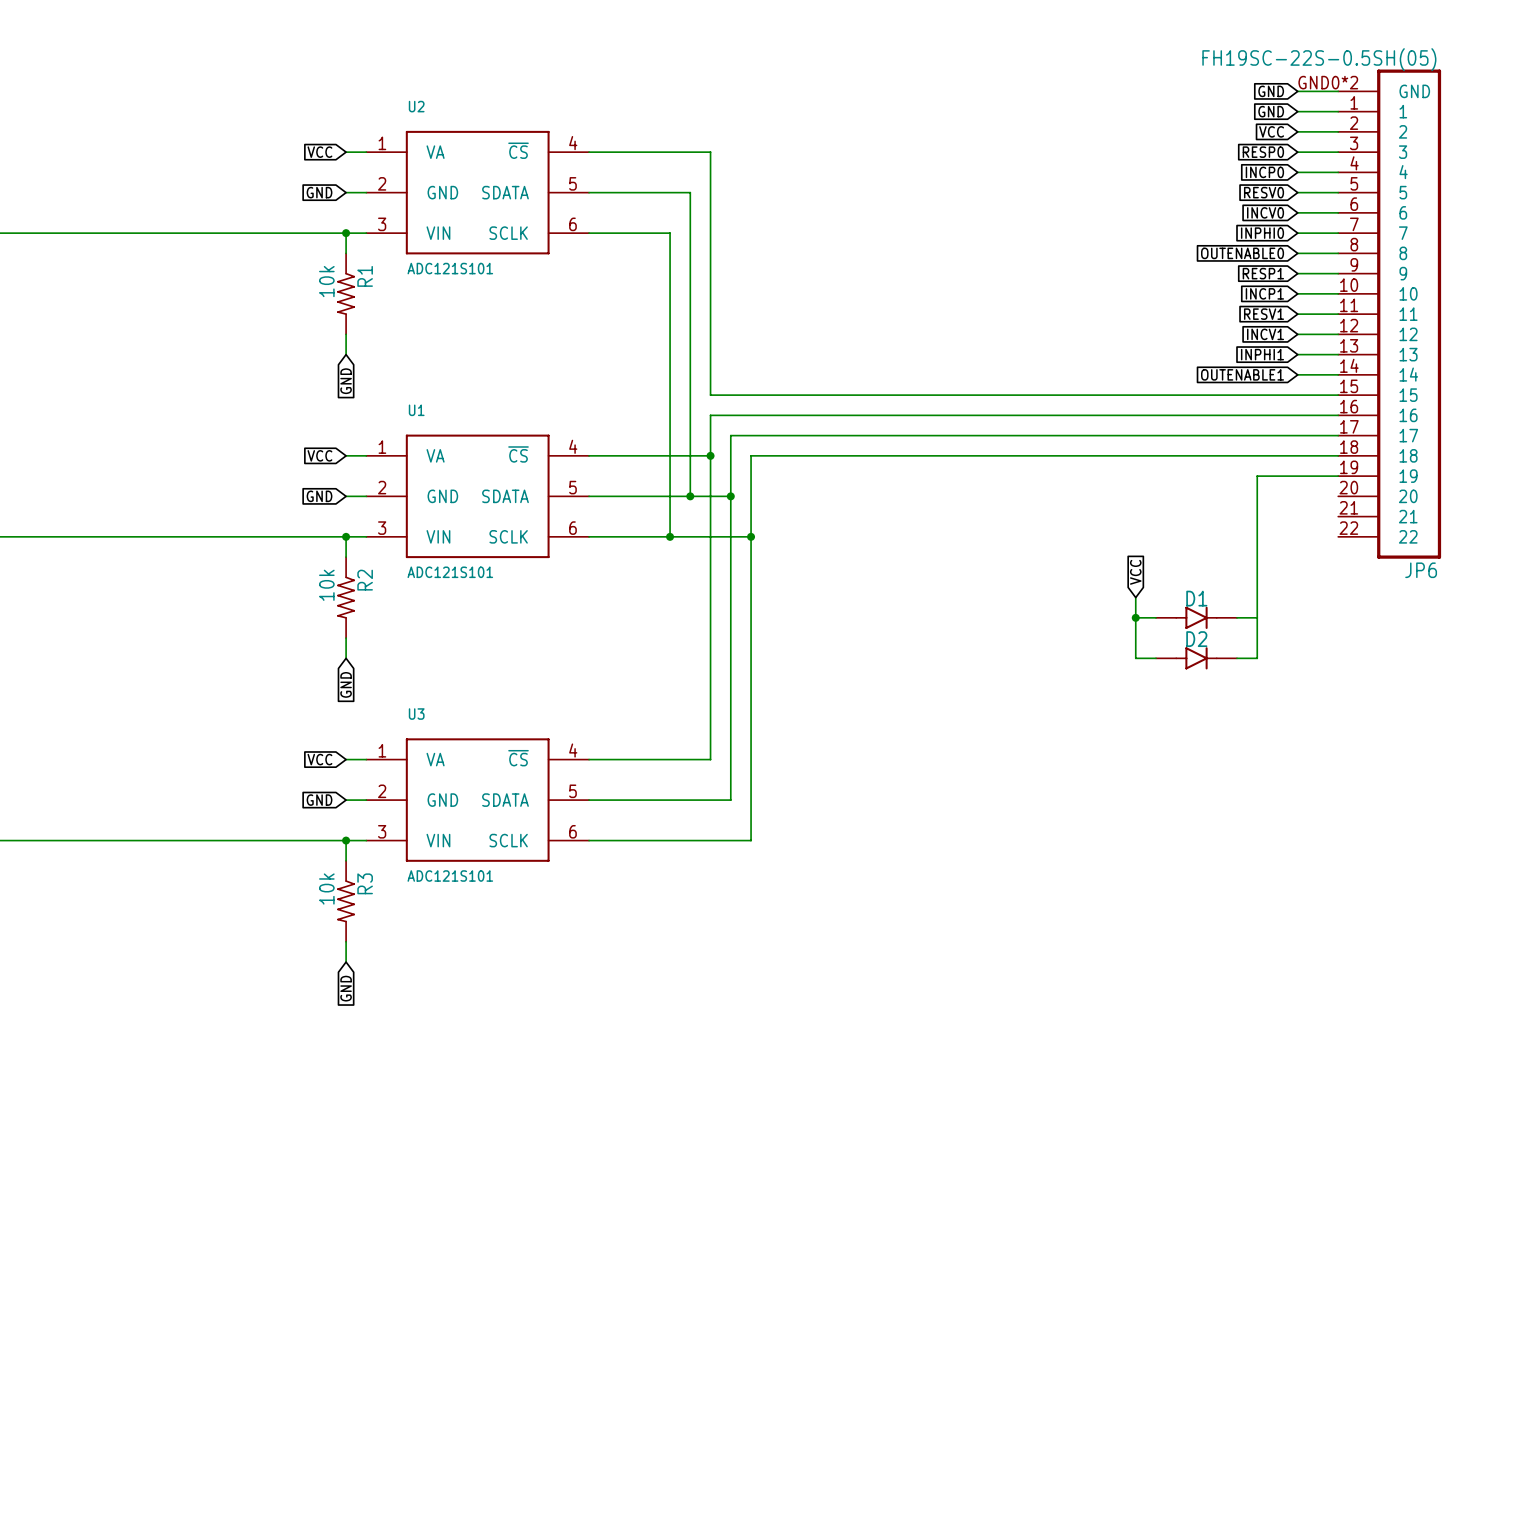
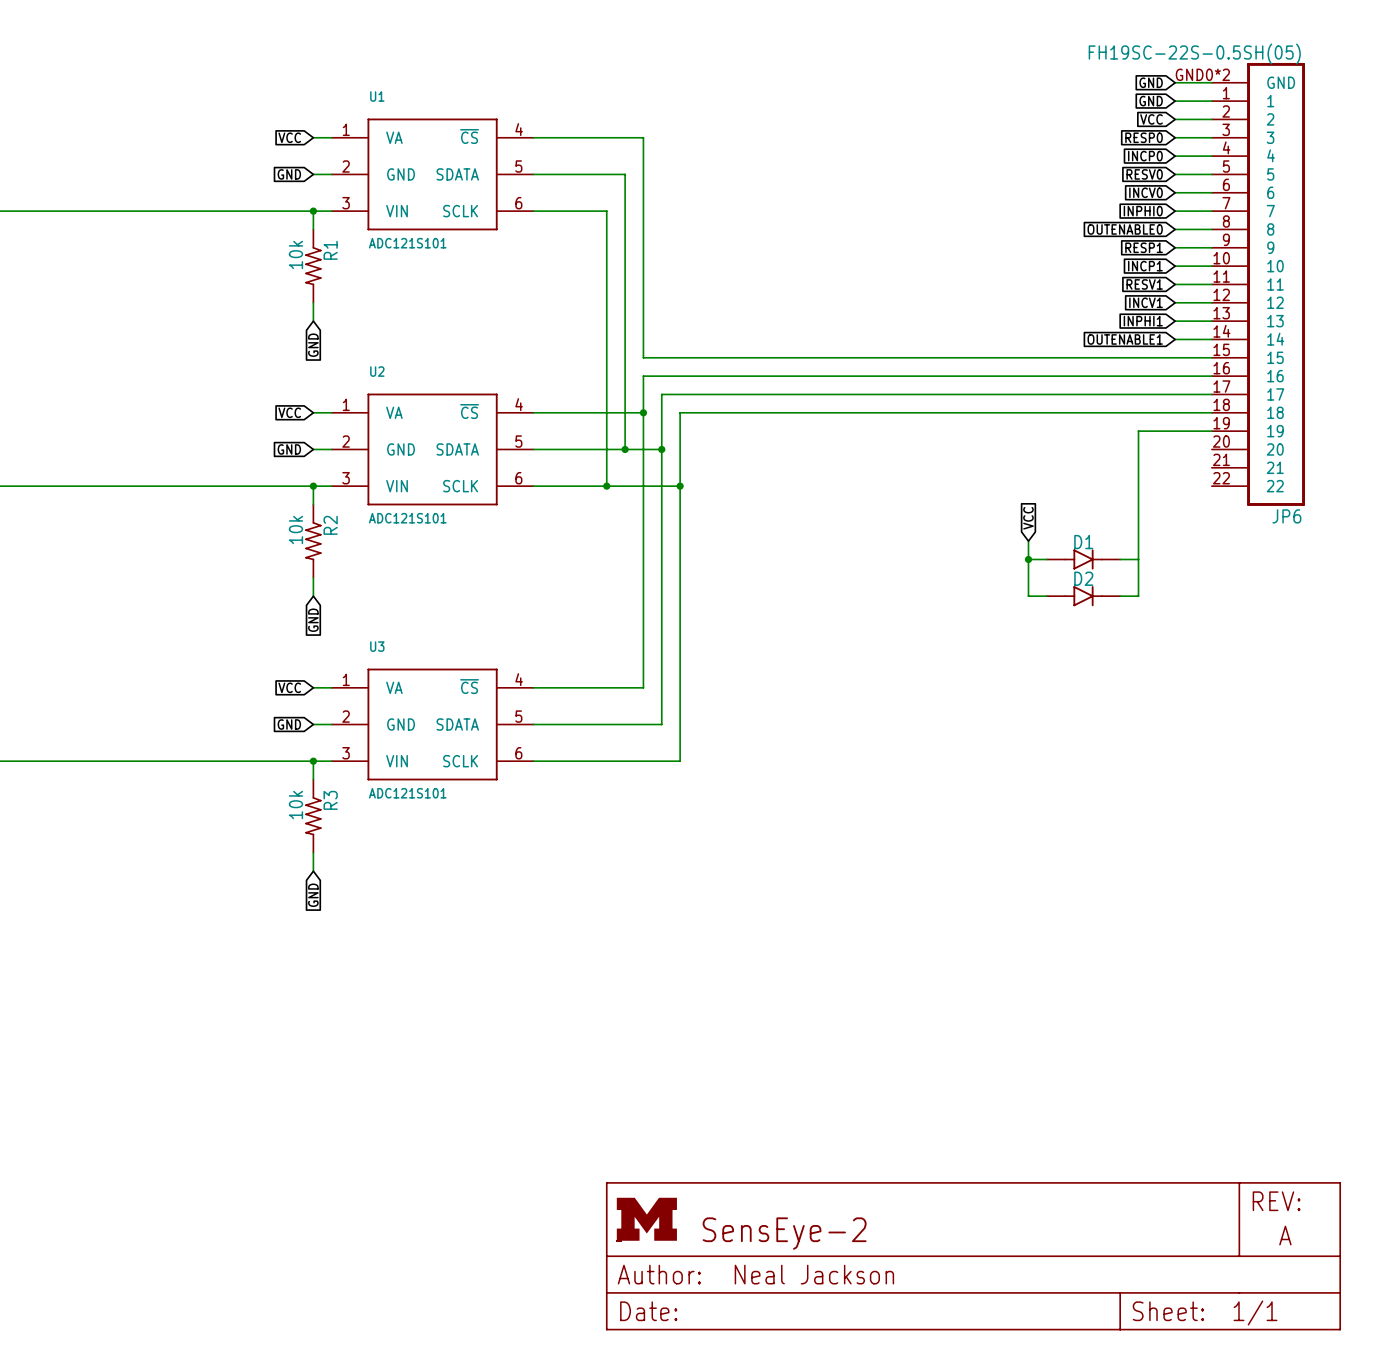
U2 name: U2 (416, 106) -> U1 (377, 96)
U1 name: U1 (416, 410) -> U2 (377, 371)
part: none -> (973, 1256)

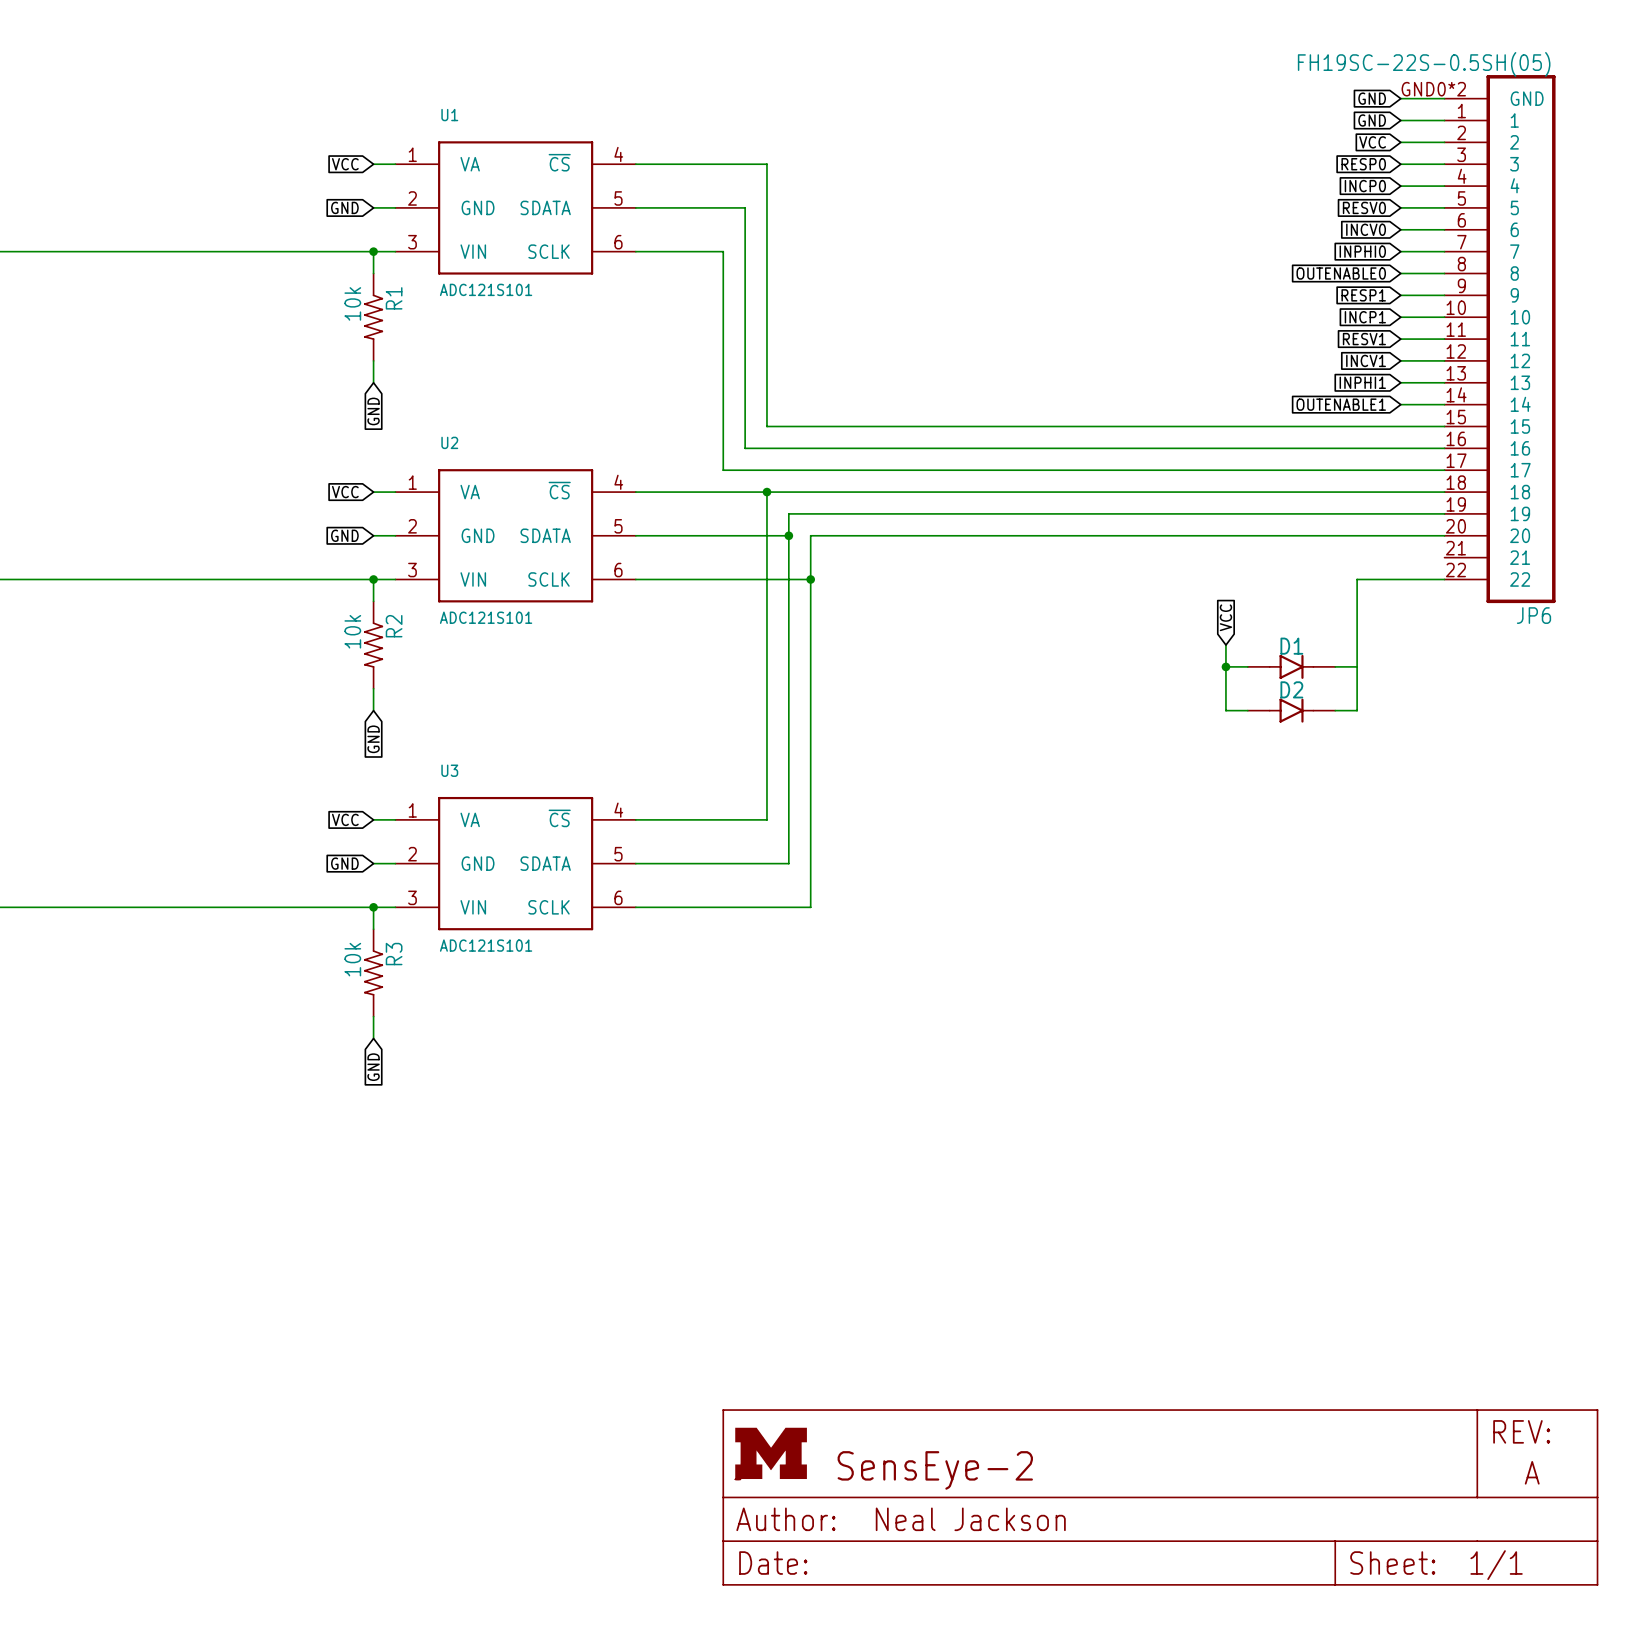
wire: (625, 376) (625, 449) -> none
wire: (643, 376) (643, 412) -> (766, 448) (745, 448)
wire: (606, 394) (606, 486) -> none
wire: (661, 394) (661, 431) -> (788, 470) (723, 470)
wire: (680, 412) (680, 449) -> (810, 492) (766, 492)
wire: none -> (788, 513) (1357, 513)
wire: (1138, 431) (1138, 486) -> (1444, 579) (1357, 579)
junction: (625, 449) -> none
wire: none -> (810, 535) (1444, 535)
junction: (606, 486) -> none

